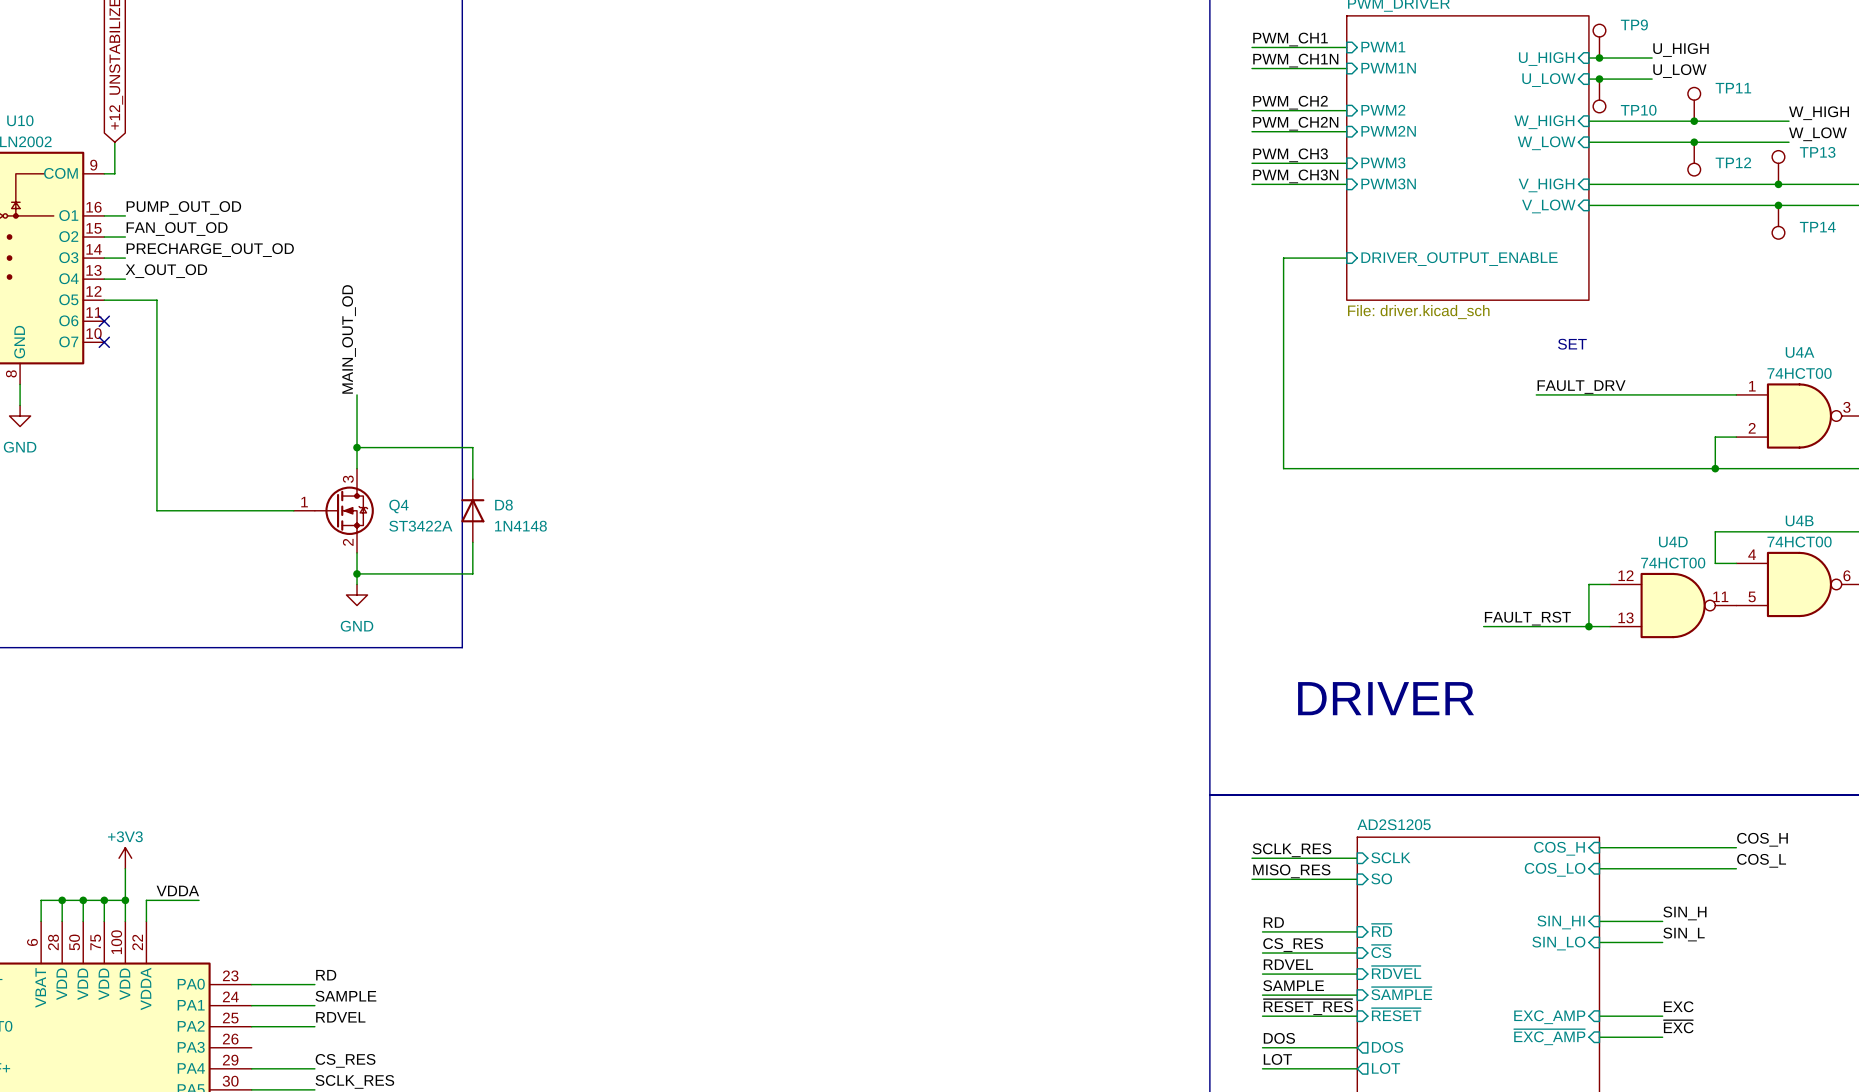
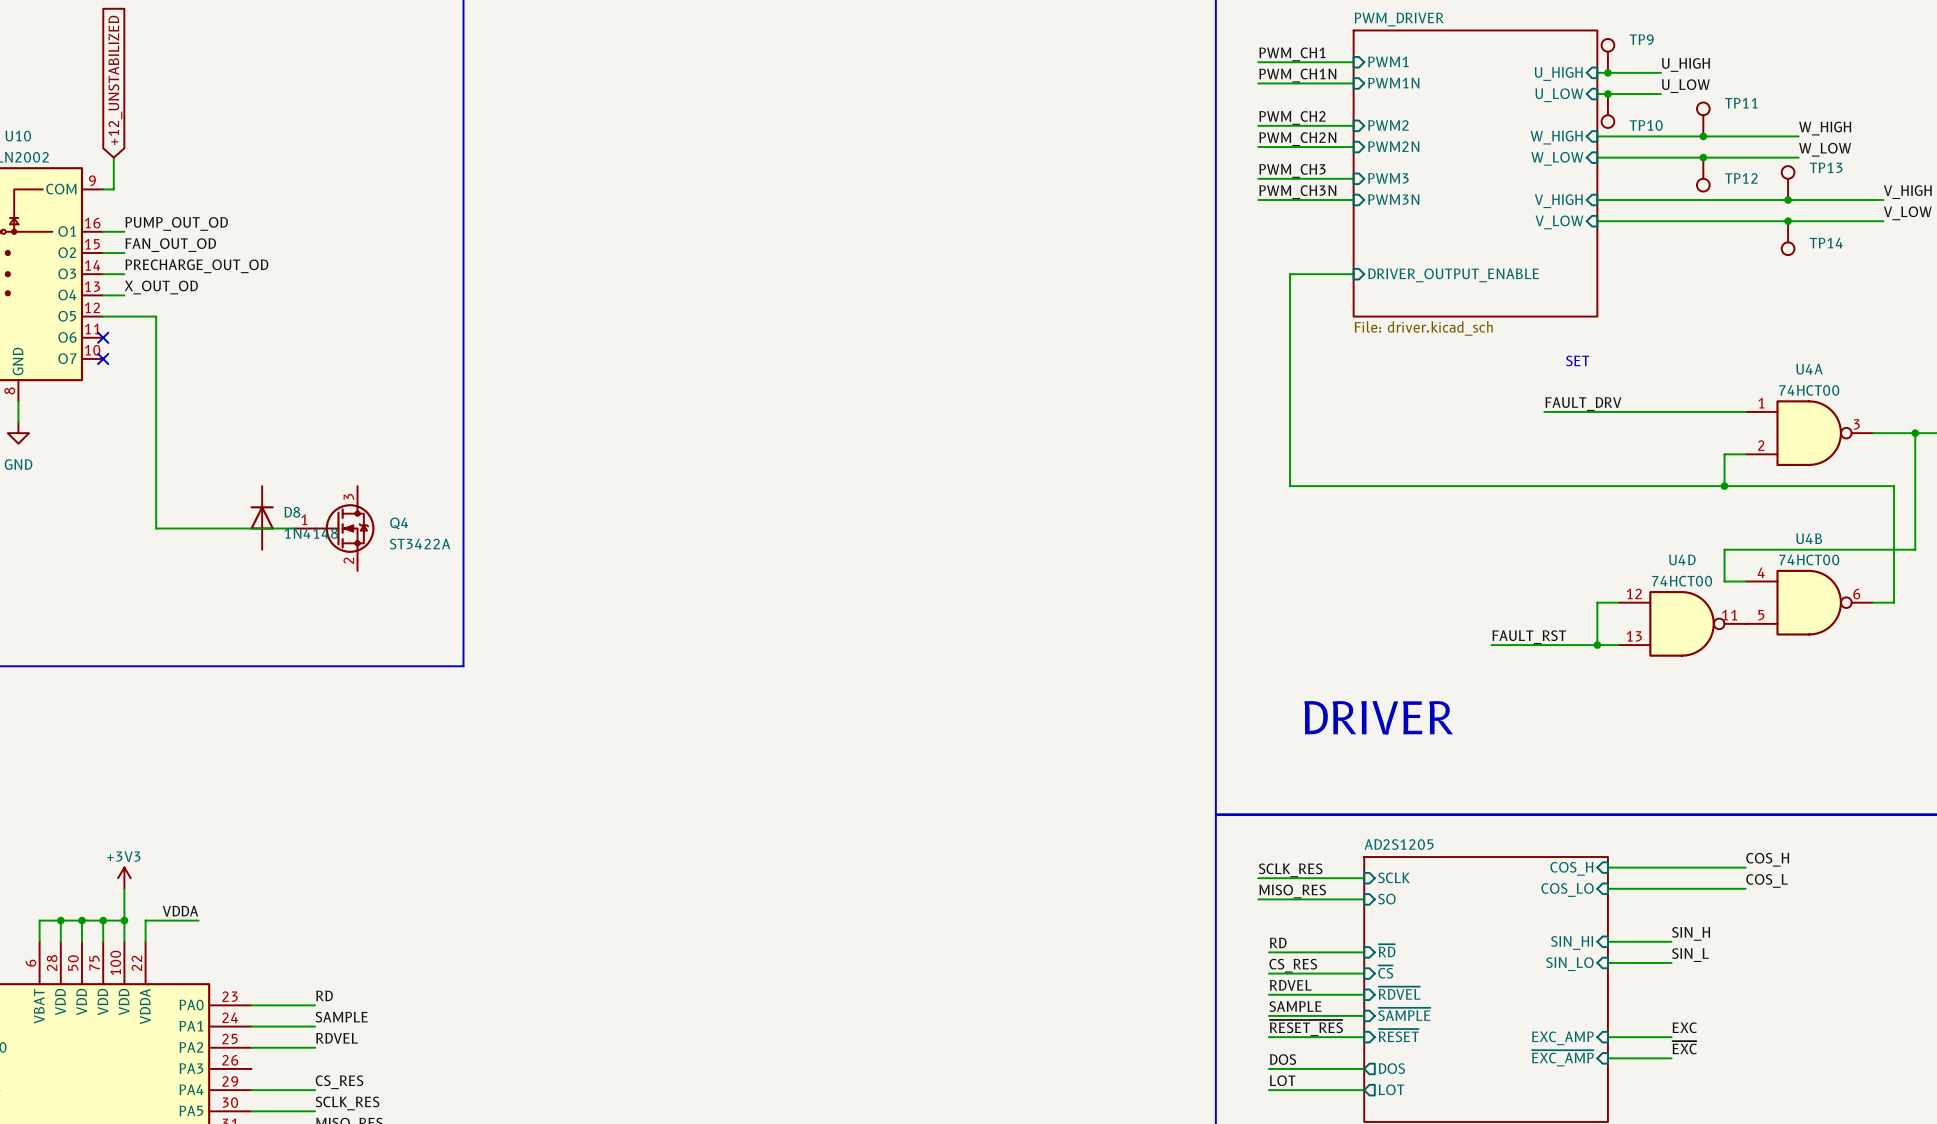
label: MAIN_OUT_OD (349, 339) -> none
wire: (357, 394) (357, 468) -> none
wire: (357, 447) (472, 447) (472, 479) -> none
junction: (357, 447) -> none
D8 position: (472, 510) -> (262, 517)
wire: (472, 542) (472, 573) (357, 573) -> none
wire: (357, 552) (357, 584) -> none
junction: (357, 573) -> none
power symbol: GND (357, 595) -> none

